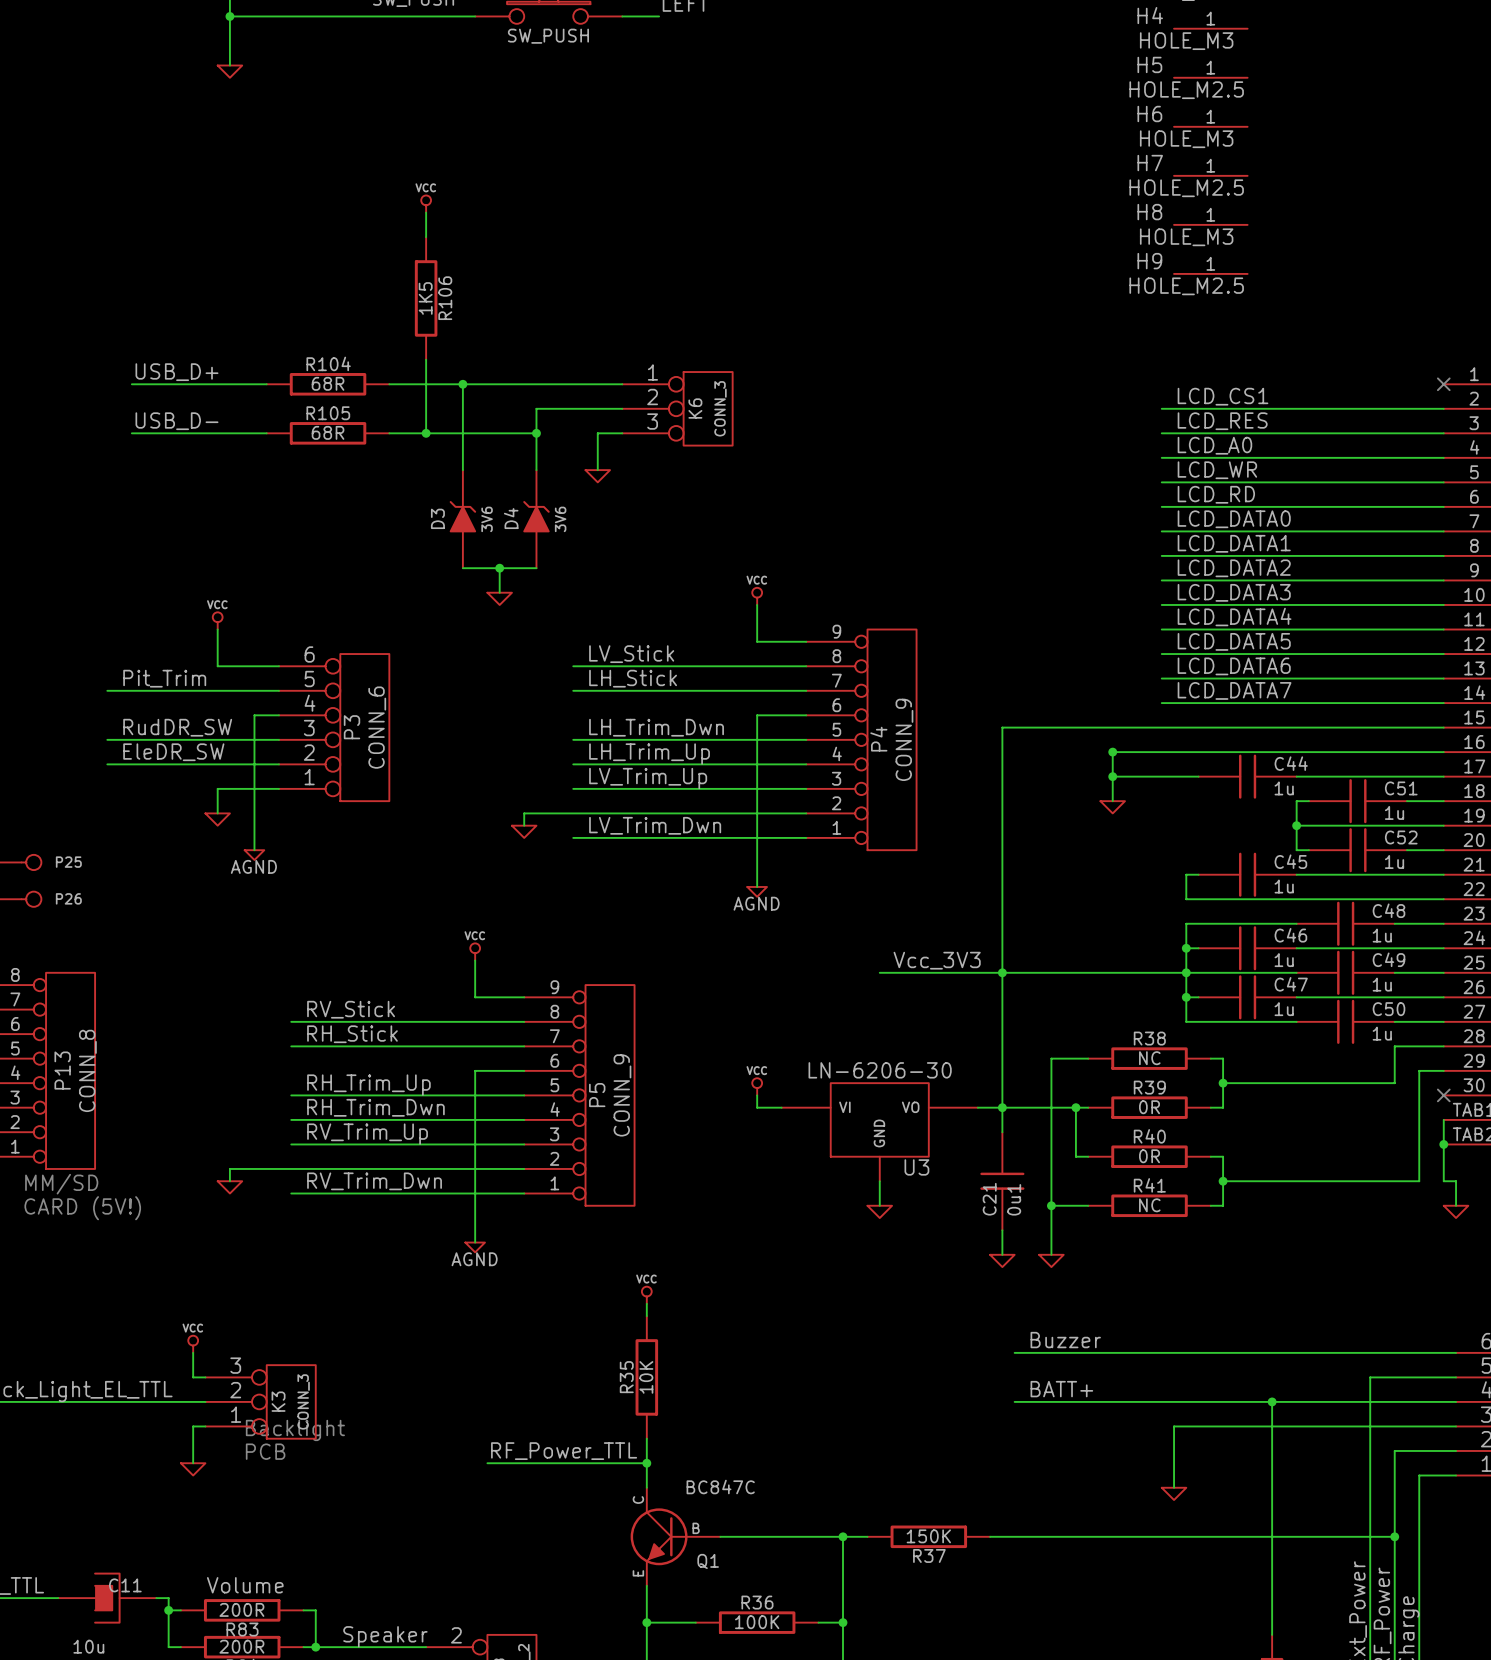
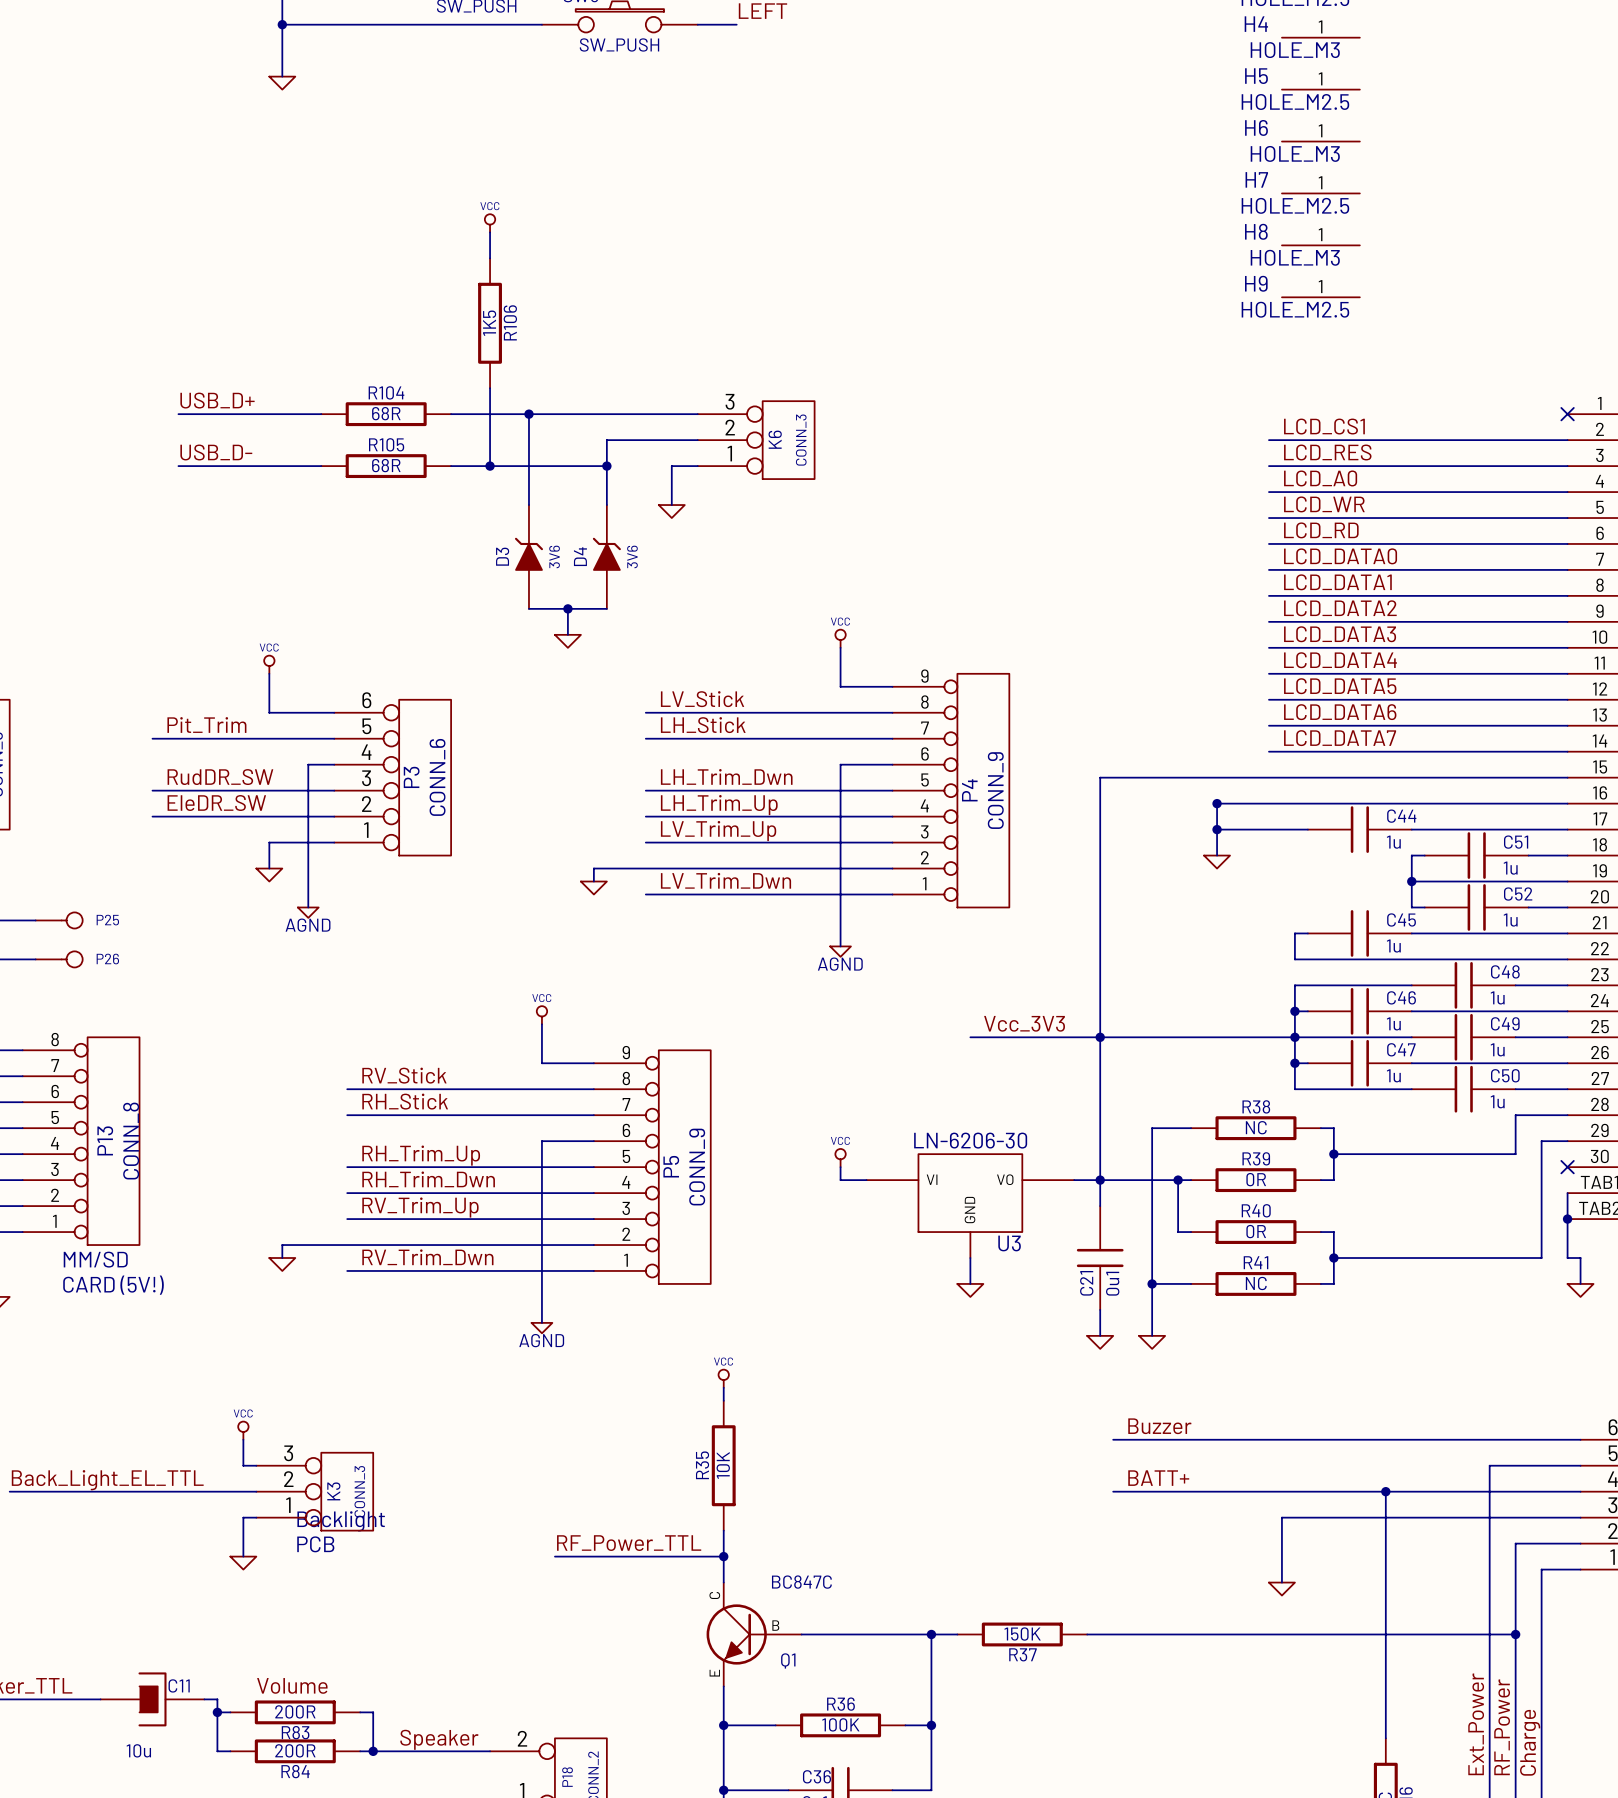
K6 flip: as is (708, 408) -> up-down (788, 440)

